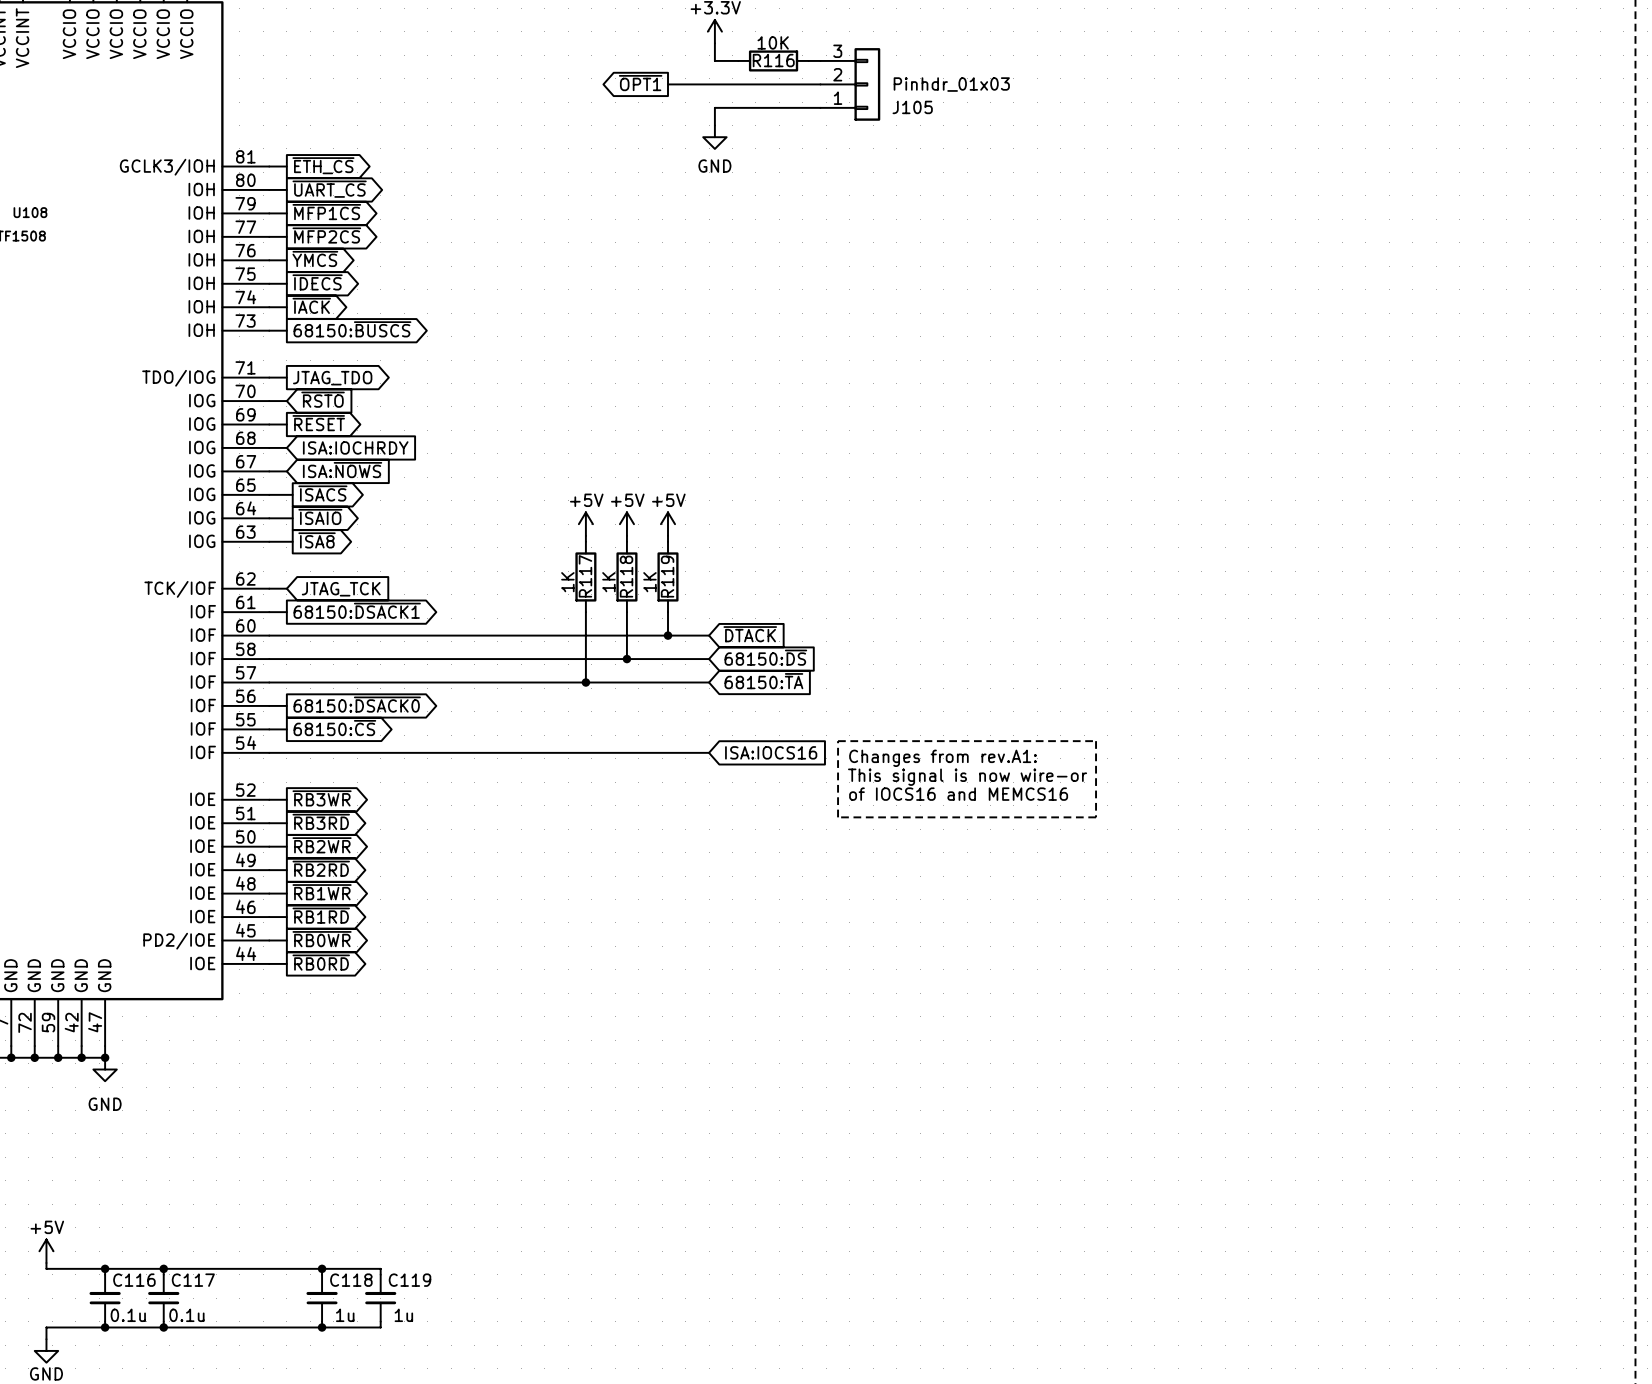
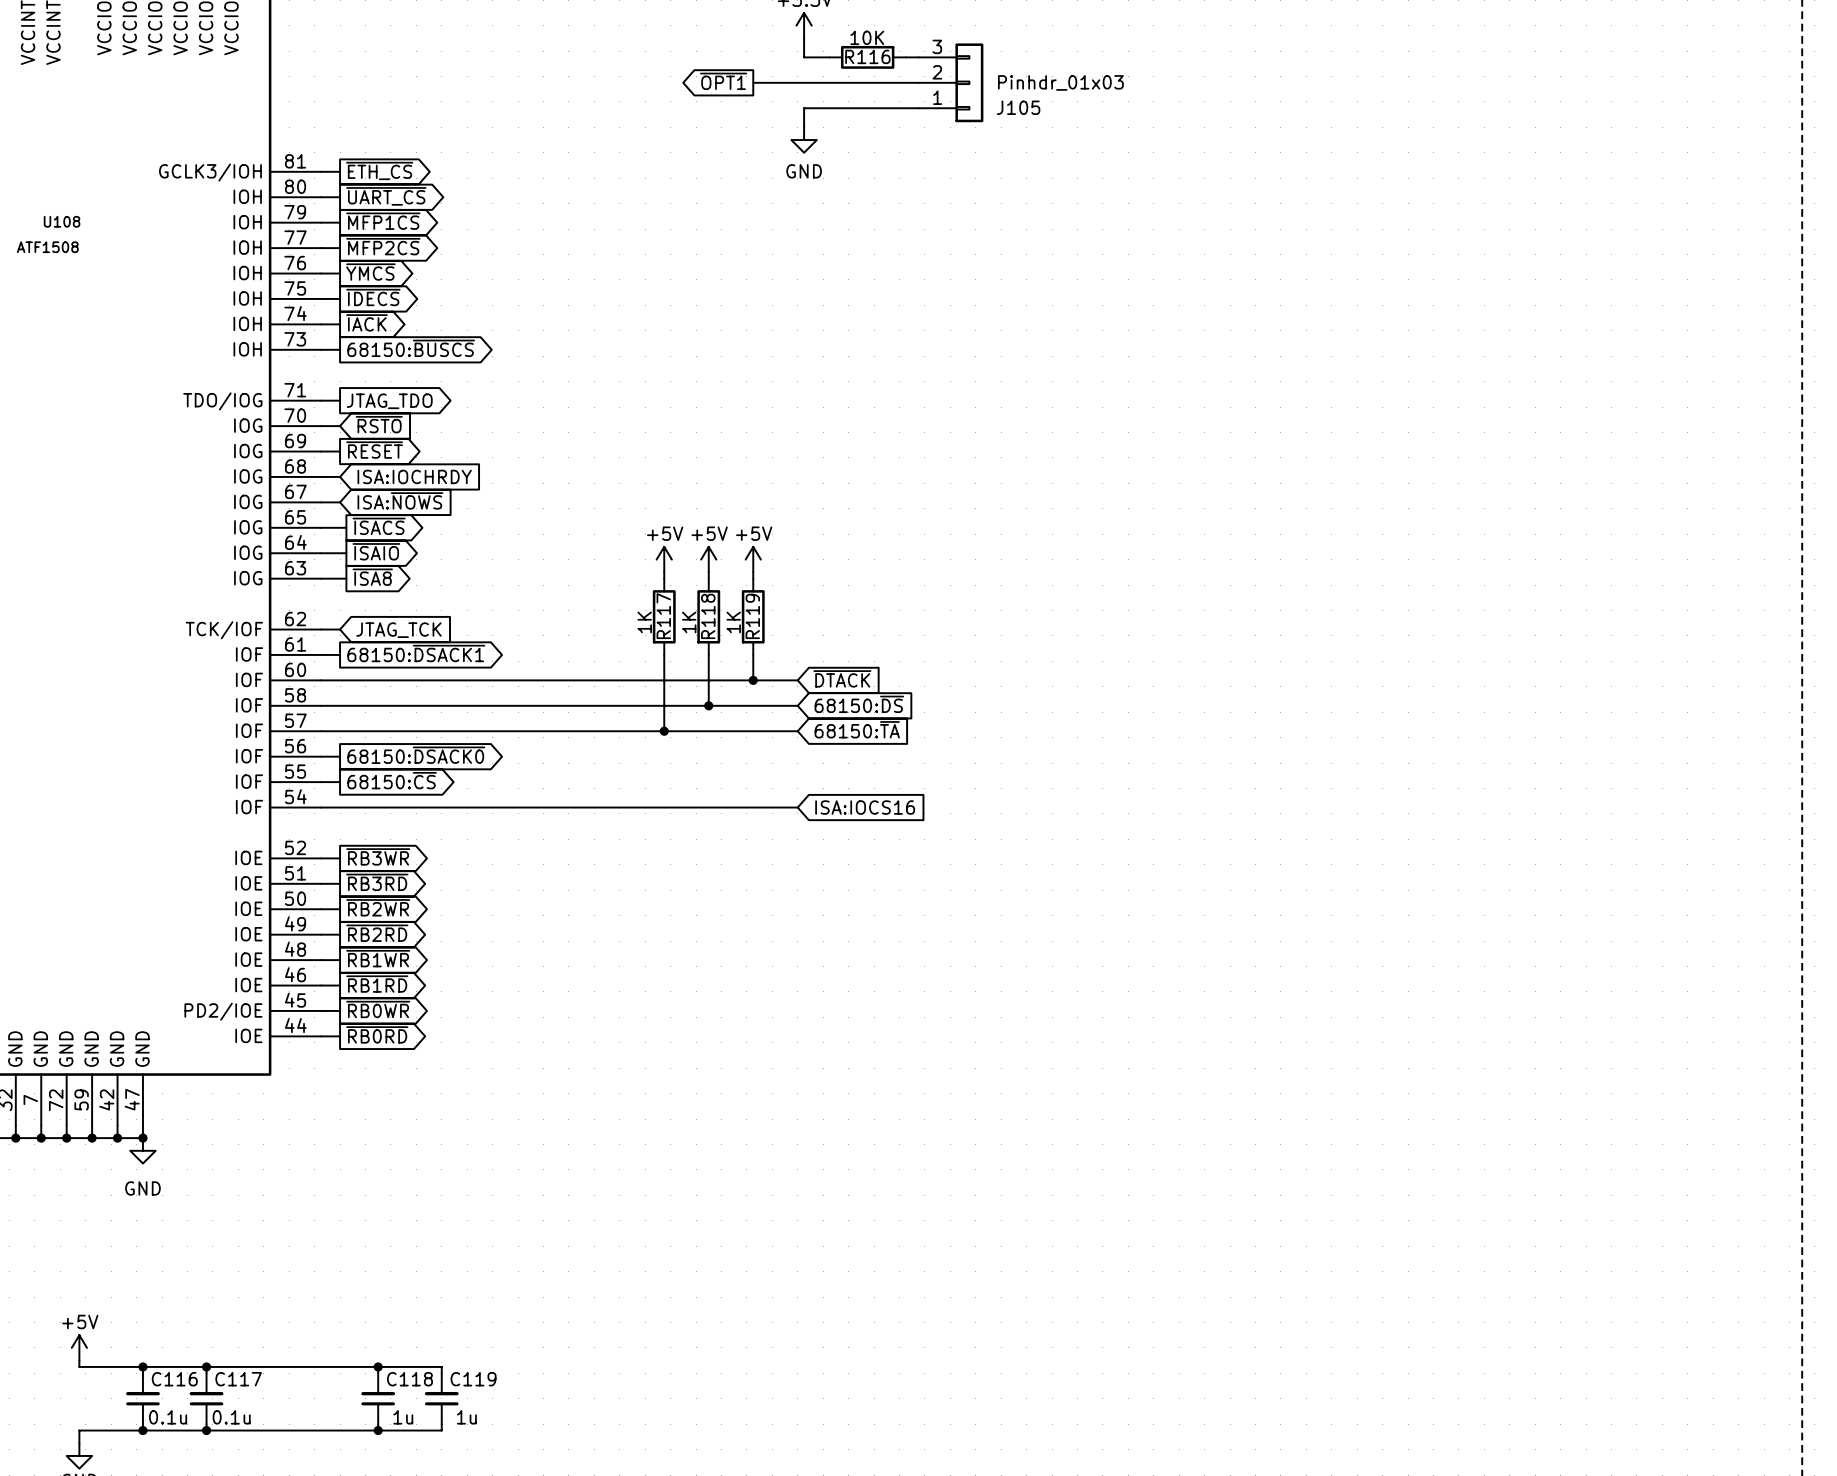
line: (838, 741) (1096, 741) (1096, 817) (838, 817) (838, 741) -> none
text: Changes from rev.A1: (942, 758) -> none
text: This signal is now wire-or (967, 777) -> none
text: of IOCS16 and MEMCS16 (958, 794) -> none

